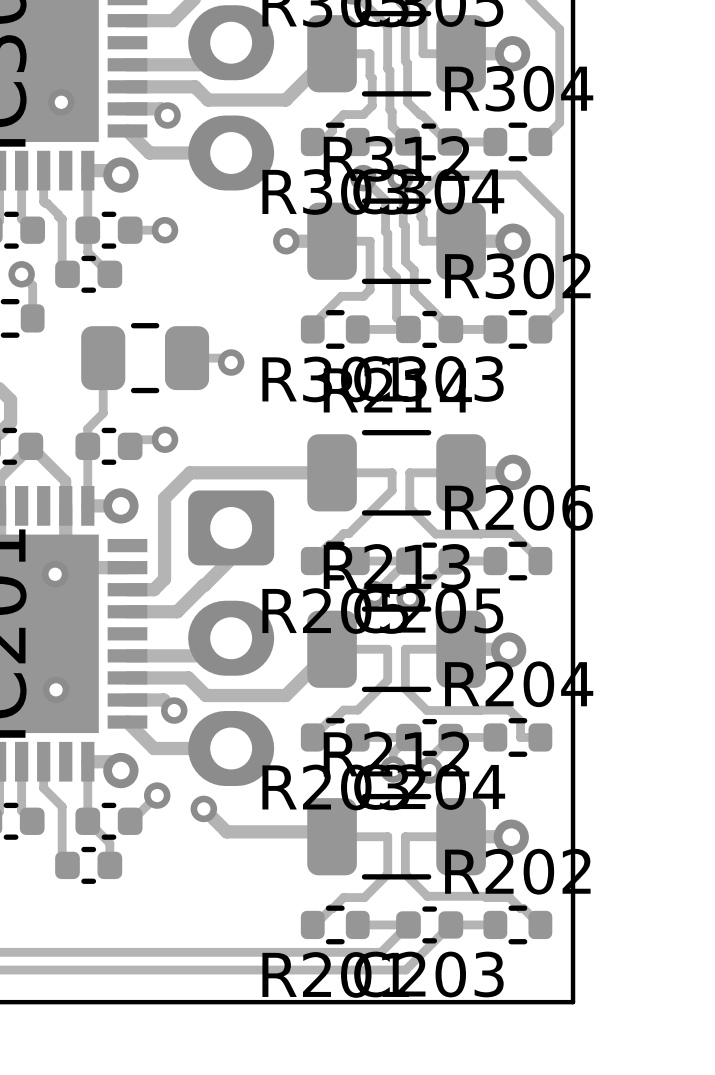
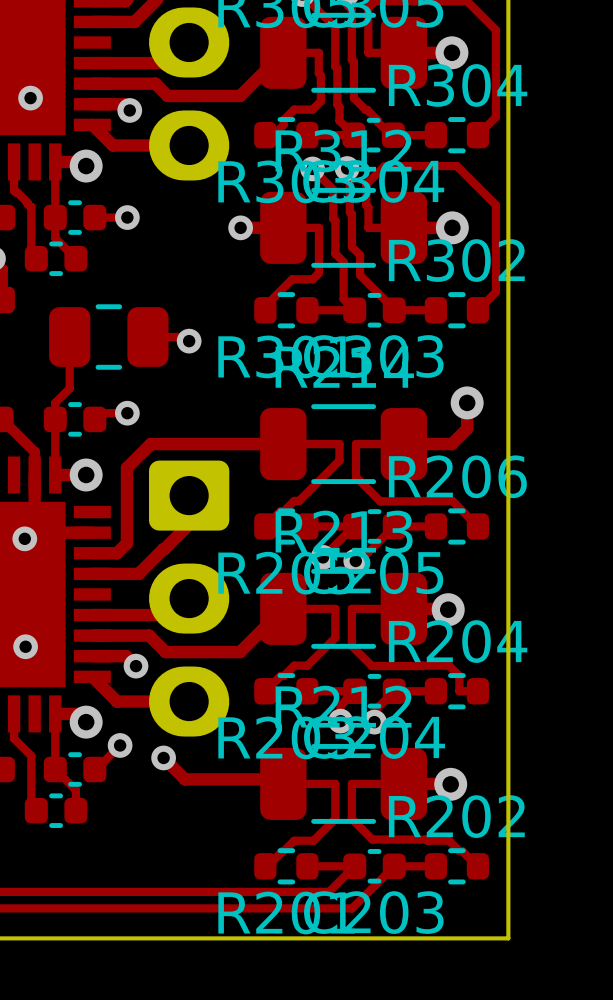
track: none -> (467, 402) (467, 428) (452, 443)
via position: (513, 472) -> (467, 402)

